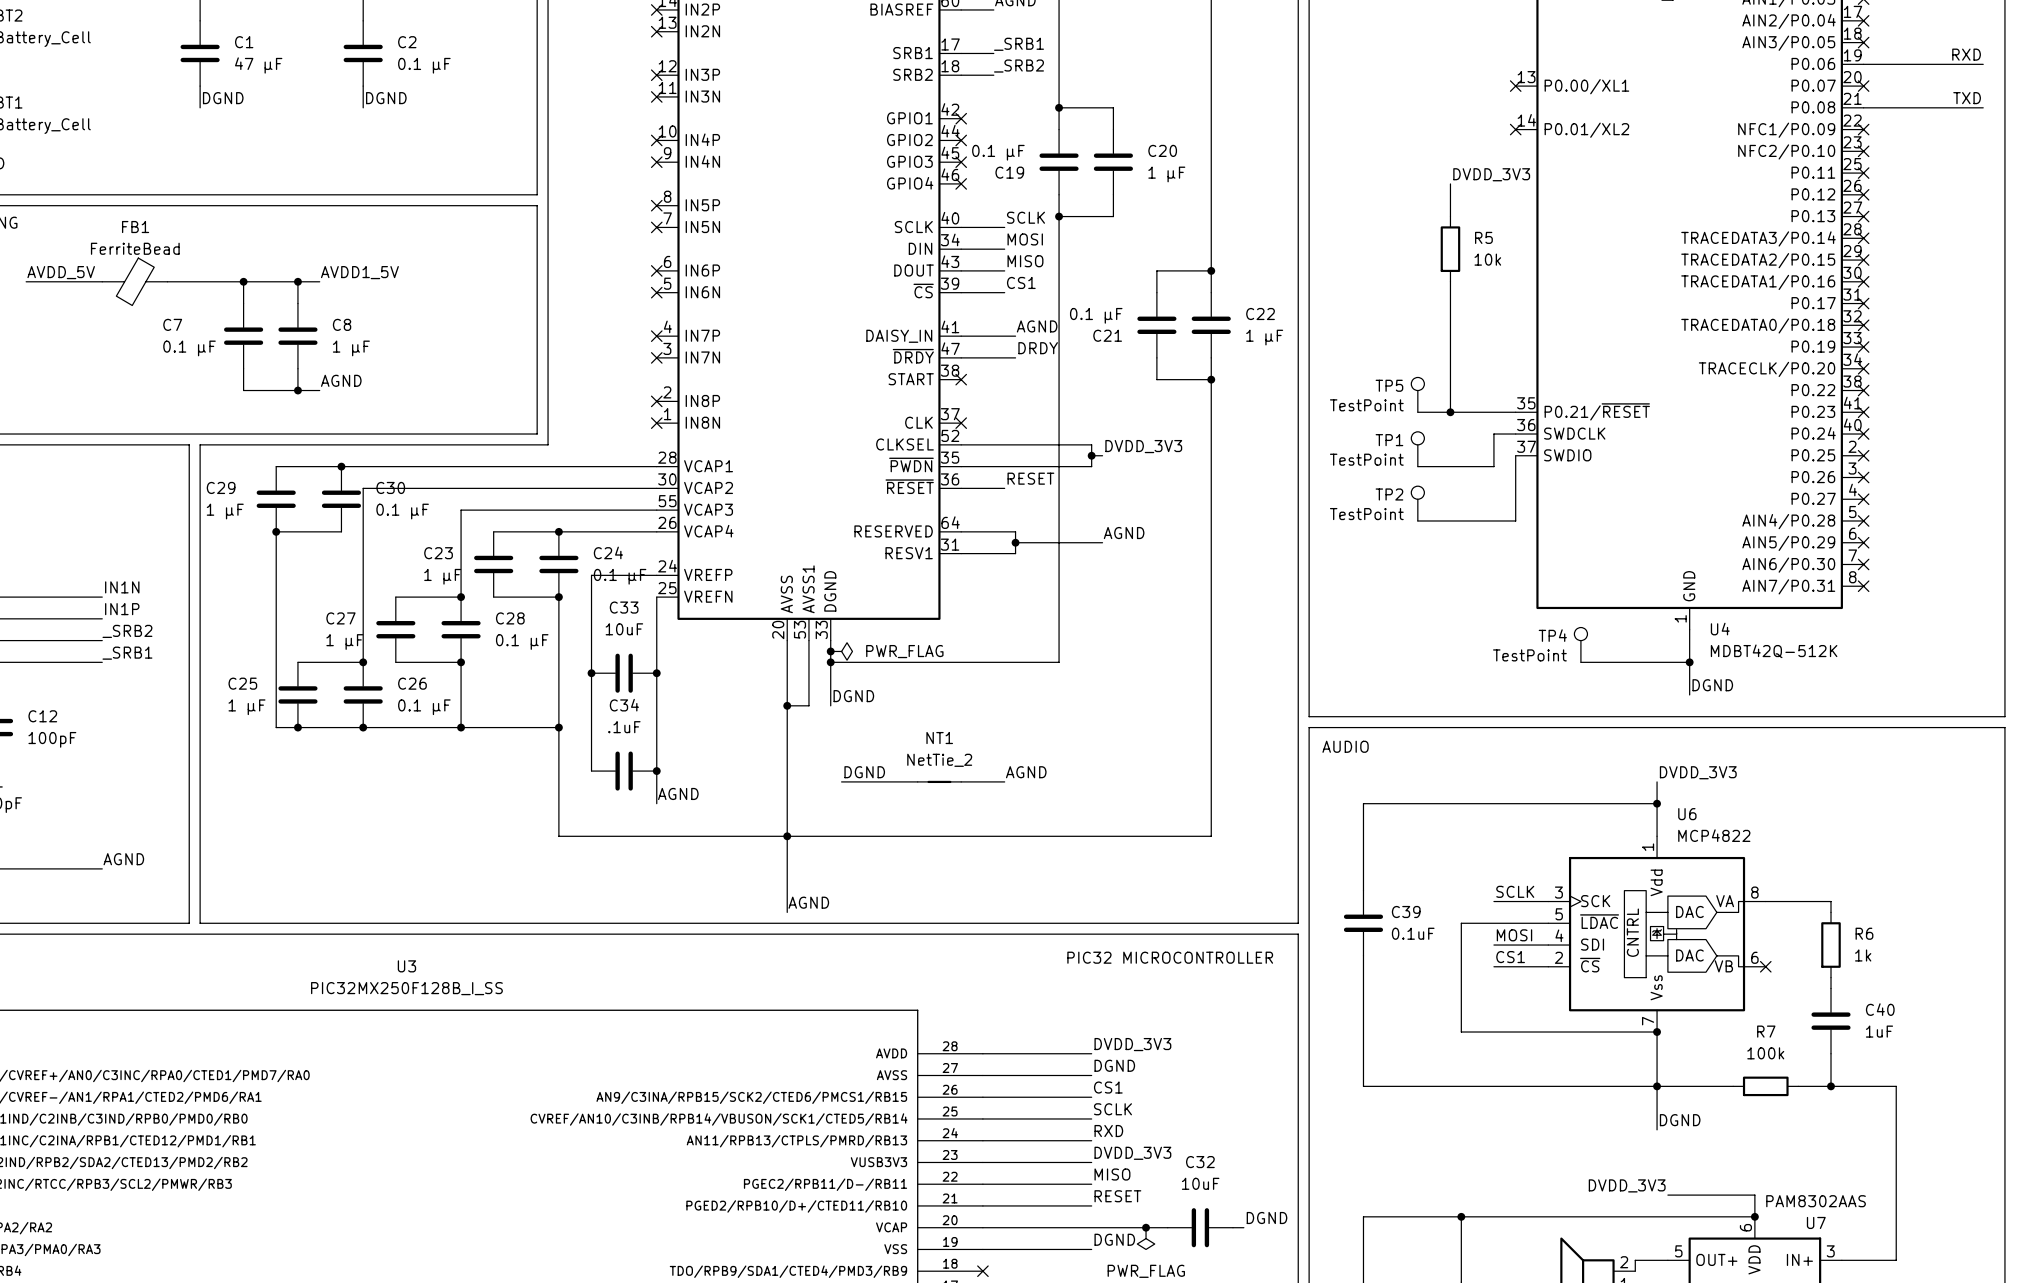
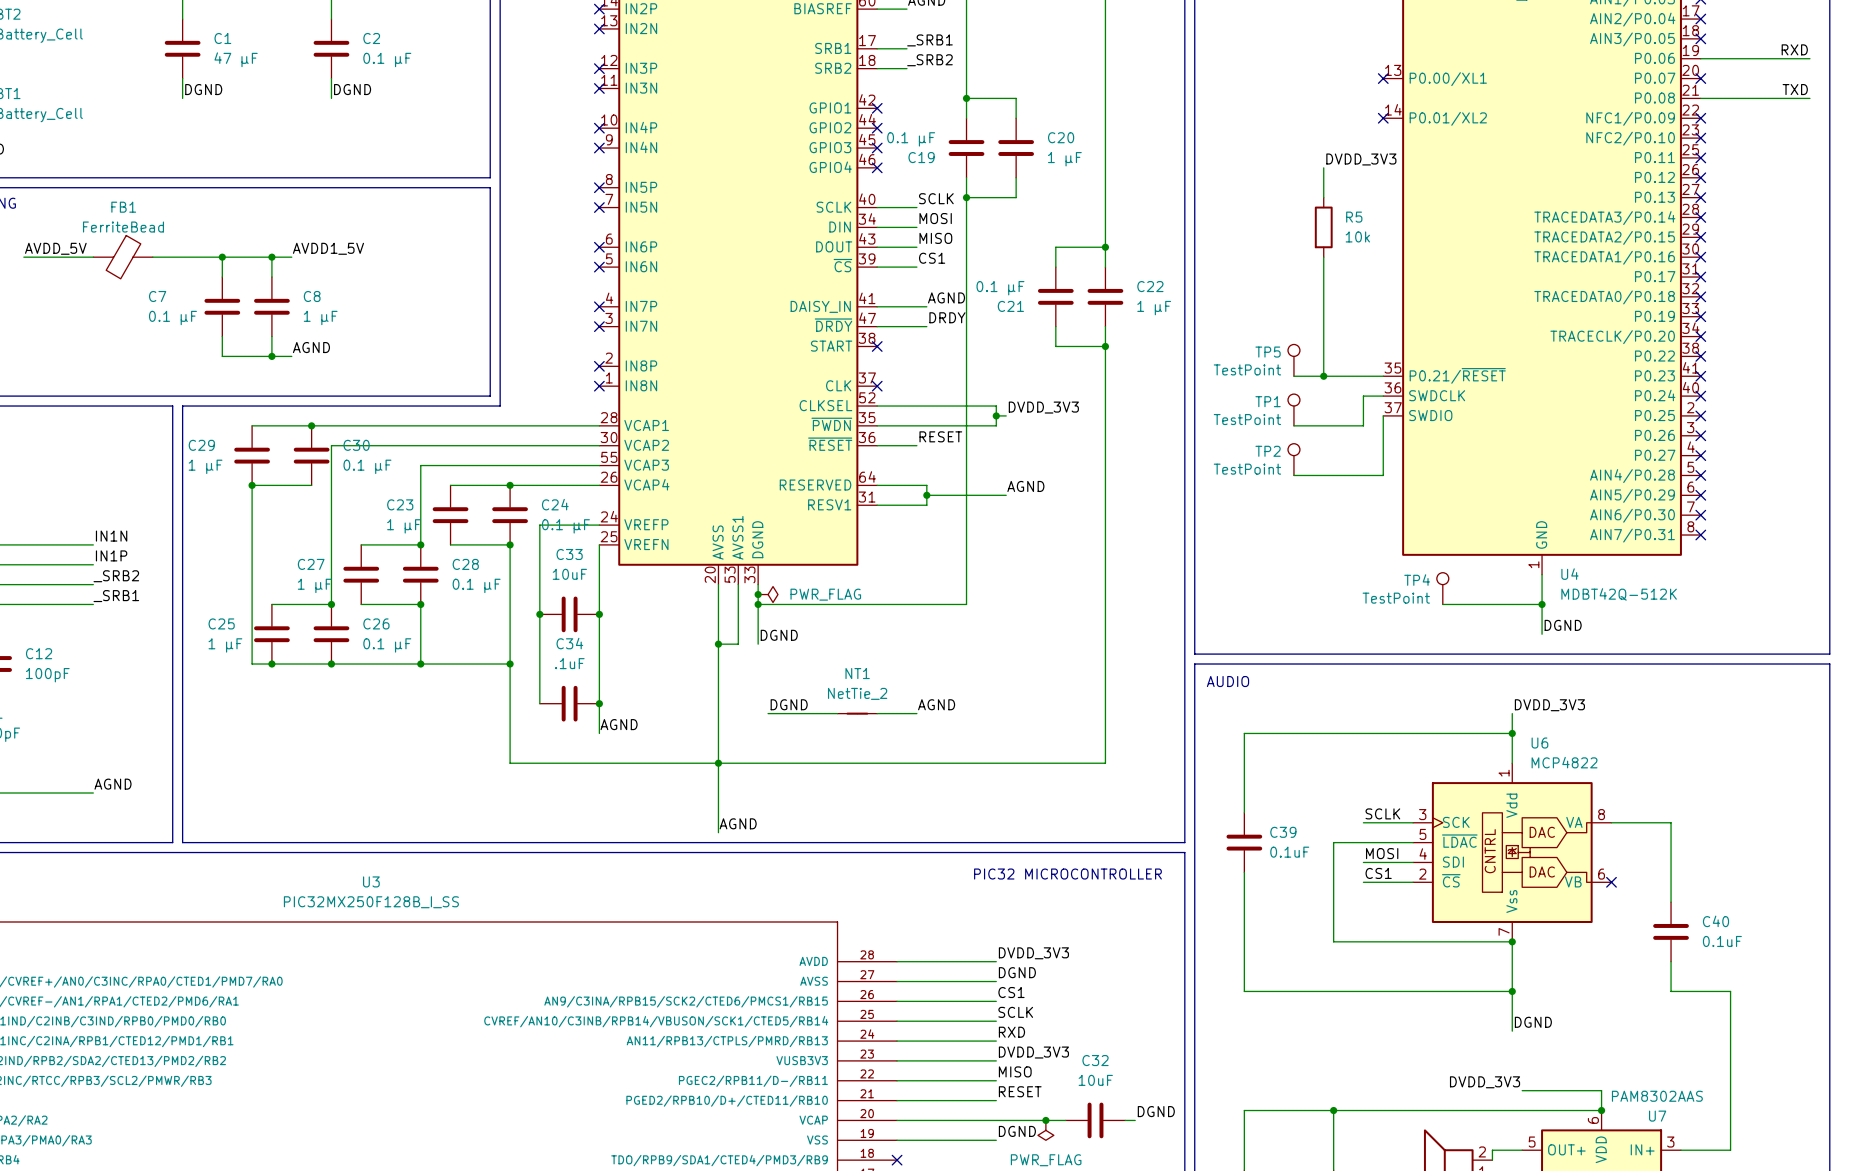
wire: none -> (1671, 832) (1671, 892)
R6: 1k (1831, 945) -> none
C40 value: 1uF (1879, 1031) -> 0.1uF (1722, 941)
wire: (1657, 1086) (1733, 1086) -> none
R7: 100k (1765, 1086) -> none
wire: (1798, 1086) (1831, 1086) -> none
junction: (1831, 1086) -> none

